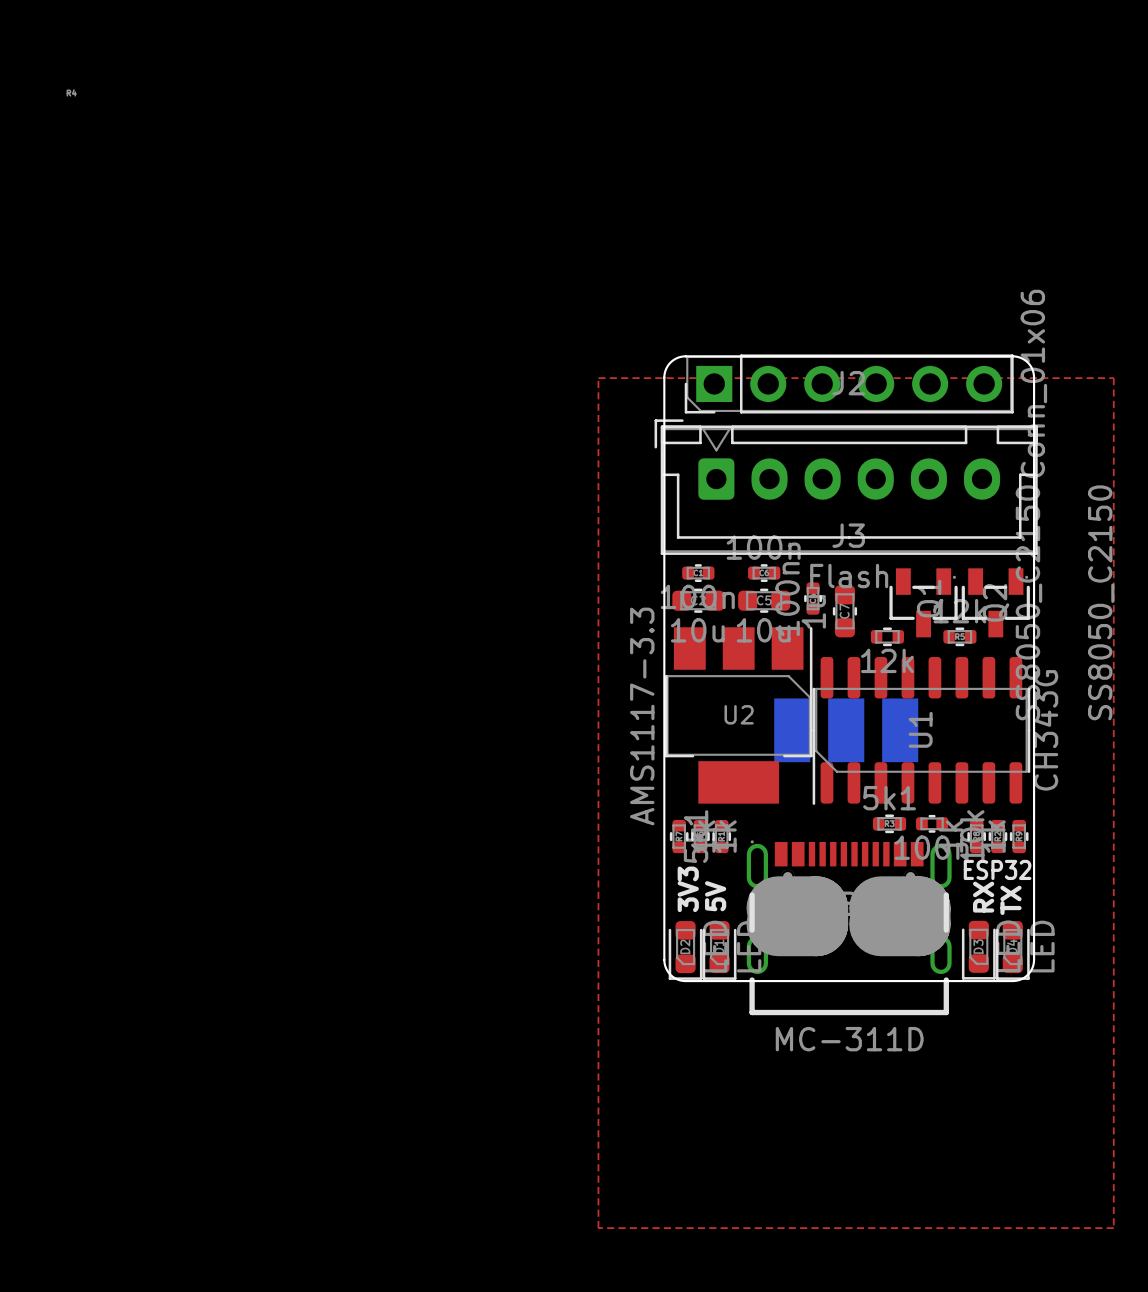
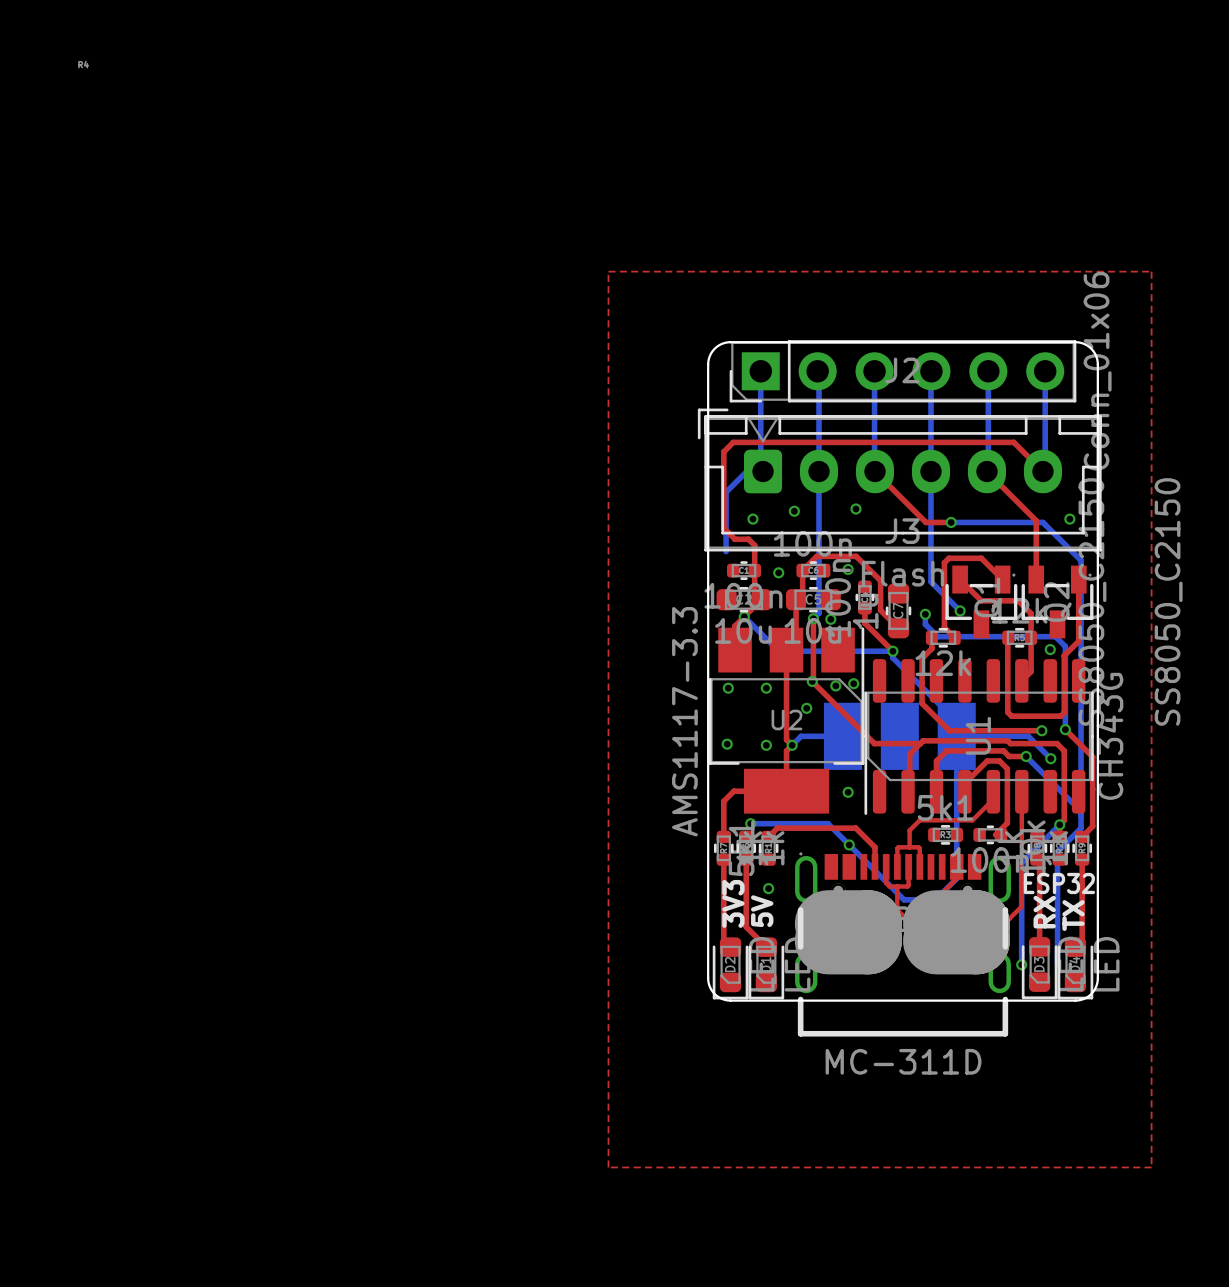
top zone outline: (598, 378) (598, 1228) (1113, 1228) (1113, 378) (598, 378) -> (608, 271) (608, 1167) (1151, 1167) (1151, 271) (608, 271)
bottom track: none -> (760, 371) (760, 469) (763, 471) (746, 471) (726, 492) (726, 551)
bottom track: none -> (817, 371) (819, 613) (813, 618)
bottom track: none -> (874, 371) (875, 471)
bottom track: none -> (931, 371) (930, 581) (960, 610)
bottom track: none -> (988, 371) (986, 471)
bottom track: none -> (1045, 371) (1045, 469) (1042, 471)
top track: none -> (875, 471) (925, 522) (951, 522)
top track: none -> (986, 471) (1036, 520) (1036, 579)
top track: none -> (1042, 471) (1013, 442) (733, 442) (723, 451) (723, 528) (735, 539) (748, 539) (754, 545) (754, 593) (761, 599) (735, 626) (735, 650)
via: none -> (855, 509)
via: none -> (794, 511)
via: none -> (752, 519)
via: none -> (1069, 519)
bottom track: none -> (951, 522) (1042, 522) (1081, 560) (1081, 828) (1057, 851) (1057, 964)
via: none -> (951, 522)
via: none -> (848, 569)
via: none -> (778, 572)
top track: none -> (960, 579) (981, 600) (1018, 600) (1031, 613) (1031, 671) (1021, 680)
top track: none -> (1002, 579) (981, 558) (948, 558) (944, 562) (944, 627) (954, 637)
top track: none -> (1078, 579) (1078, 641) (1064, 655) (1064, 712) (1060, 716) (1011, 716) (1007, 712) (1008, 637)
top track: none -> (864, 608) (864, 623) (892, 651)
via: none -> (960, 610)
bottom track: none -> (925, 614) (925, 624) (937, 636) (1055, 636) (1065, 646) (1065, 729)
via: none -> (925, 614)
bottom track: none -> (744, 616) (778, 651) (892, 651) (892, 657) (956, 721) (956, 878) (935, 899) (904, 899) (827, 823) (750, 823)
via: none -> (744, 616)
top track: none -> (813, 618) (812, 681) (874, 743) (920, 743)
via: none -> (813, 618)
via: none -> (830, 619)
top track: none -> (898, 628) (880, 610) (880, 580) (856, 556) (816, 556) (802, 570) (802, 593) (796, 599) (796, 640) (786, 650) (786, 739) (792, 745) (786, 750) (786, 791) (733, 791) (723, 801) (723, 836)
top track: none -> (931, 637) (931, 648) (922, 658) (922, 703) (949, 730) (1041, 730)
via: none -> (1050, 649)
via: none -> (892, 651)
via: none -> (812, 681)
via: none -> (853, 683)
via: none -> (835, 685)
via: none -> (728, 688)
via: none -> (766, 688)
via: none -> (806, 708)
top track: none -> (1065, 729) (1092, 756) (1092, 826) (1082, 836)
via: none -> (1065, 729)
via: none -> (1041, 730)
bottom track: none -> (842, 736) (801, 736) (792, 745)
bottom track: none -> (956, 736) (1028, 736) (1050, 758)
via: none -> (727, 744)
via: none -> (766, 745)
via: none -> (792, 745)
bottom track: none -> (1026, 756) (1081, 811)
top track: none -> (1026, 756) (1009, 756) (1003, 750) (946, 750) (936, 761) (936, 791)
via: none -> (1026, 756)
via: none -> (1050, 758)
top track: none -> (908, 791) (909, 790) (909, 754) (923, 740) (1007, 740) (1010, 743) (1056, 743) (1064, 750) (1064, 820) (1059, 824) (1059, 836)
top track: none -> (964, 791) (964, 783) (987, 760) (999, 760) (1007, 768) (1007, 823) (995, 834)
top track: none -> (993, 791) (993, 799) (972, 820) (919, 820) (909, 830) (909, 847)
top track: none -> (1021, 791) (1021, 906) (1009, 918) (906, 918) (897, 909) (897, 886)
via: none -> (848, 792)
via: none -> (750, 823)
bottom track: none -> (1059, 824) (1021, 862) (1021, 964)
via: none -> (1059, 824)
top track: none -> (768, 836) (777, 828) (855, 828) (875, 847) (875, 866)
via: none -> (849, 844)
top track: none -> (723, 859) (723, 940) (730, 947)
top track: none -> (746, 859) (746, 926) (766, 947)
top track: none -> (1037, 859) (1039, 861) (1039, 946)
top track: none -> (1082, 859) (1082, 940) (1075, 947)
top track: none -> (886, 866) (886, 883) (889, 886) (908, 885) (908, 866)
top track: none -> (897, 866) (898, 847) (918, 847) (919, 866)
top track: none -> (956, 866) (956, 878) (935, 899)
via: none -> (768, 888)
via: none -> (1021, 964)

